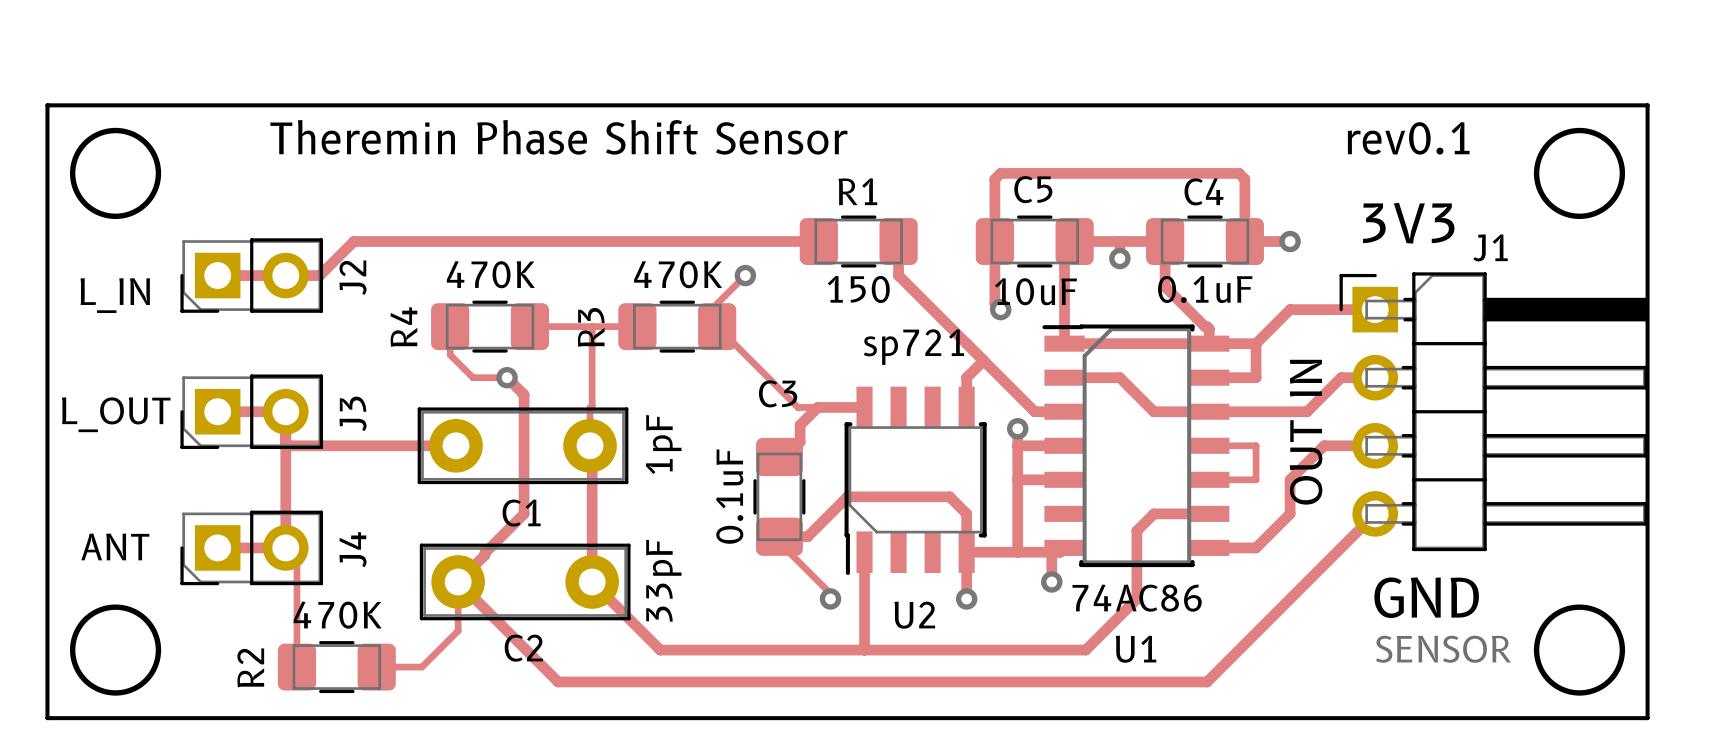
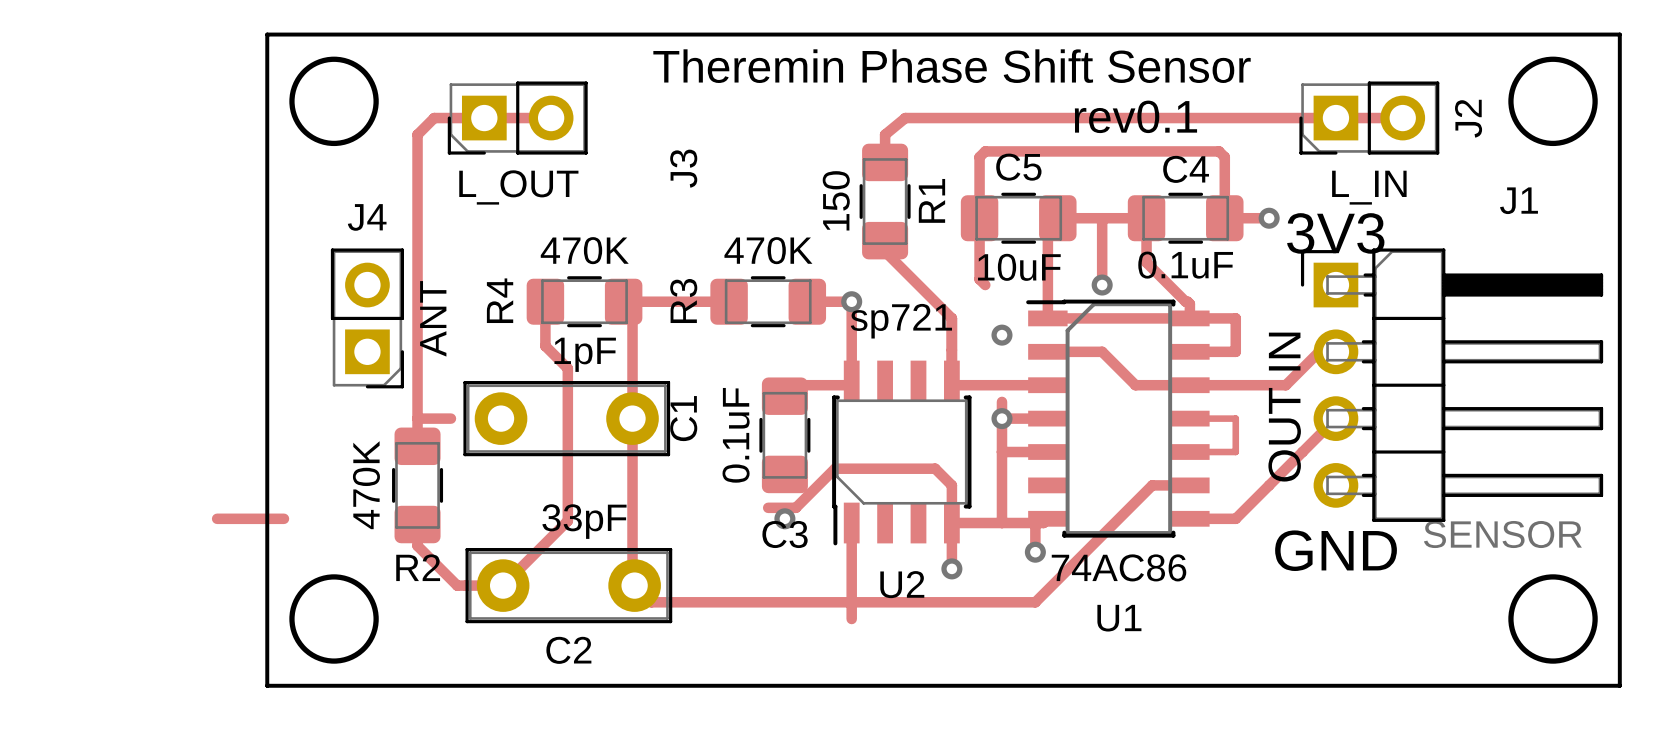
board edge: (1647, 105) (47, 105) (47, 718) (268, 718) -> (1619, 84) (1619, 34) (267, 34) (267, 685)
text position: Theremin Phase Shift Sensor (558, 137) -> Theremin Phase Shift Sensor (952, 66)
text position: rev0.1 (1408, 138) -> rev0.1 (1135, 116)
track: none -> (551, 118) (434, 118) (417, 134) (417, 446)
track: none -> (1402, 118) (905, 118) (885, 134) (885, 162)
round board edge position: (115, 173) -> (334, 101)
round board edge position: (1579, 173) -> (1553, 101)
text position: 3V3 (1408, 223) -> 3V3 (1335, 233)
track: (818, 241) (353, 241) (319, 275) (217, 275) -> none
R1 rotation: 0° (858, 241) -> 90° clockwise (885, 201)
J1 name position: J1 (1490, 247) -> J1 (1519, 200)
track: none -> (1102, 234) (1102, 285)
via position: (1119, 258) -> (1102, 285)
J2 position: (251, 275) -> (1369, 118)
track: (745, 275) (717, 303) (717, 326) (797, 407) (864, 407) (817, 407) (800, 425) (800, 442) (779, 462) -> none
via: (745, 275) -> none
J2 value position: L_IN (115, 295) -> L_IN (1369, 187)
via: (1000, 309) -> none
track: (1375, 309) (1290, 309) (1256, 343) -> none
track: (450, 326) (450, 354) (473, 377) (507, 377) (524, 394) (524, 513) (458, 581) -> none
R4 position: (490, 326) -> (584, 301)
track: (529, 326) (632, 326) -> (628, 301) (729, 301)
track: none -> (545, 301) (545, 346) (567, 368) (567, 520) (497, 591)
track: (592, 326) (592, 405) (590, 407) (590, 445) (592, 447) (592, 581) (660, 650) (1085, 650) (1136, 598) (1136, 530) (1153, 513) (1170, 513) -> (623, 301) (632, 310) (632, 583) (651, 602) (1035, 602) (1152, 485)
R3 position: (677, 326) -> (768, 301)
track: none -> (807, 301) (851, 301) (851, 381) (847, 385) (795, 385) (784, 396)
via: none -> (851, 301)
track: (966, 343) (1034, 411) -> (951, 381) (956, 385) (1018, 385)
track: (983, 360) (966, 377) -> (951, 318) (951, 351)
via: none -> (1001, 335)
via: (507, 377) -> none
C3 name position: C3 (778, 393) -> C3 (785, 534)
track: (217, 411) (285, 411) (285, 547) (296, 559) (296, 667) -> none
J3 position: (251, 411) -> (517, 118)
J1 position: (1493, 411) -> (1452, 385)
J3 name position: J3 (353, 413) -> J3 (683, 168)
J3 value position: L_OUT (116, 414) -> L_OUT (518, 187)
via position: (1017, 428) -> (1001, 418)
C1 value rotation: 0° (663, 444) -> 90° clockwise (585, 354)
C1 value position: 1pF (663, 444) -> 1pF (585, 354)
track: (285, 445) (421, 445) -> none
C1 position: (523, 445) -> (566, 418)
track: (1375, 445) (1324, 445) (1290, 479) (1290, 513) -> (1335, 418) (1269, 485)
C3 position: (779, 496) -> (784, 435)
C1 name rotation: 0° (521, 513) -> 90° counterclockwise (683, 418)
C1 name position: C1 (521, 513) -> C1 (683, 418)
track: (1375, 513) (1207, 681) (558, 681) (458, 581) -> none
track: (779, 542) (830, 593) (830, 598) -> none
J4 value position: ANT (115, 546) -> ANT (433, 318)
J4 rotation: 0° (251, 547) -> 90° counterclockwise (367, 318)
J4 position: (251, 547) -> (367, 318)
track: none -> (417, 524) (417, 545) (457, 585) (503, 585)
C2 value rotation: 0° (663, 580) -> 90° clockwise (584, 521)
track: (458, 581) (458, 630) (421, 667) (376, 667) -> none
C2 position: (525, 581) -> (568, 585)
text position: GND (1426, 597) -> GND (1336, 550)
via position: (830, 598) -> (784, 518)
R2 value position: 470K (337, 615) -> 470K (366, 485)
J1 value position: SENSOR (1443, 649) -> SENSOR (1502, 534)
round board edge position: (115, 650) -> (334, 618)
R2 name position: R2 (250, 667) -> R2 (418, 567)
R2 rotation: 0° (336, 667) -> 90° clockwise (417, 485)
R2 position: (336, 667) -> (417, 485)

